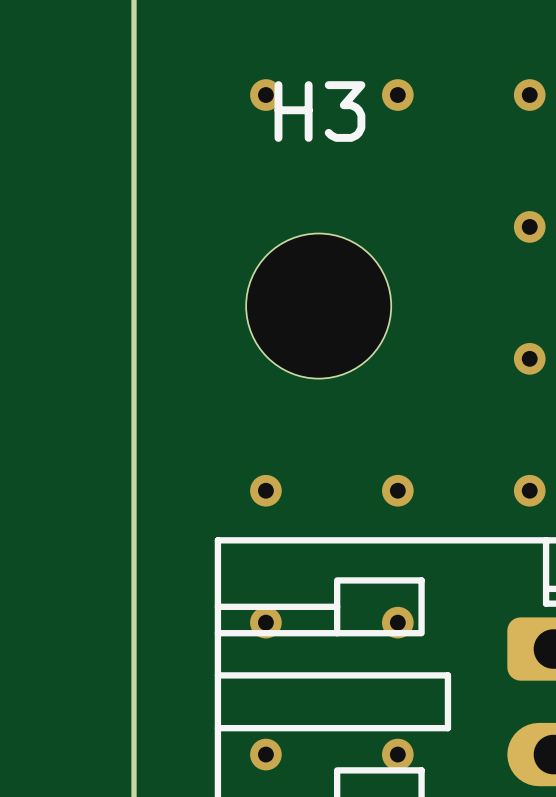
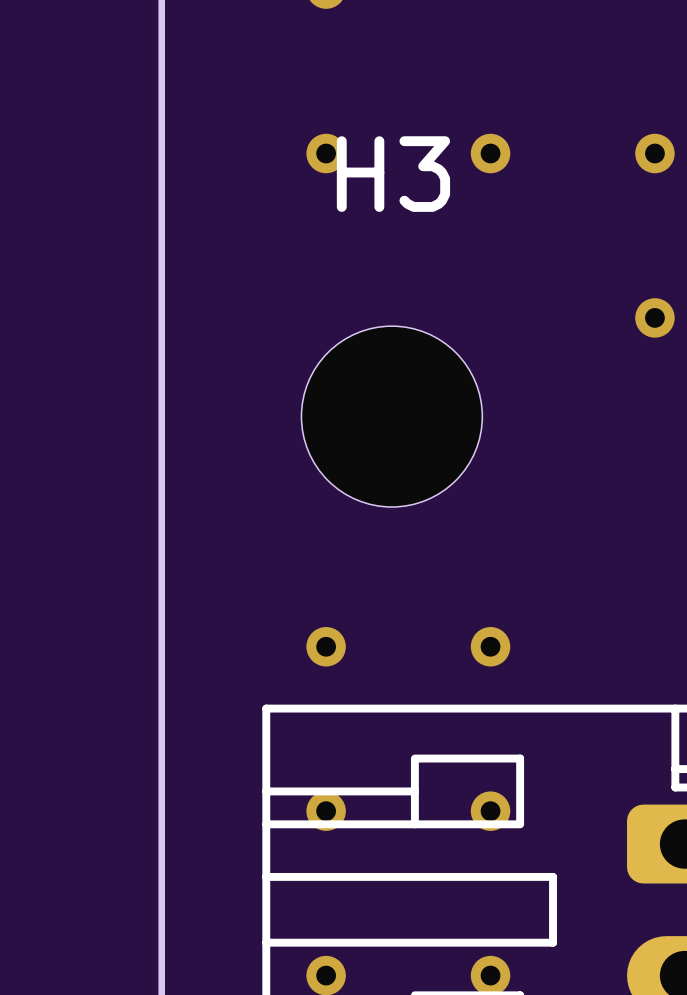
via: (529, 358) -> none
via: (529, 490) -> none

